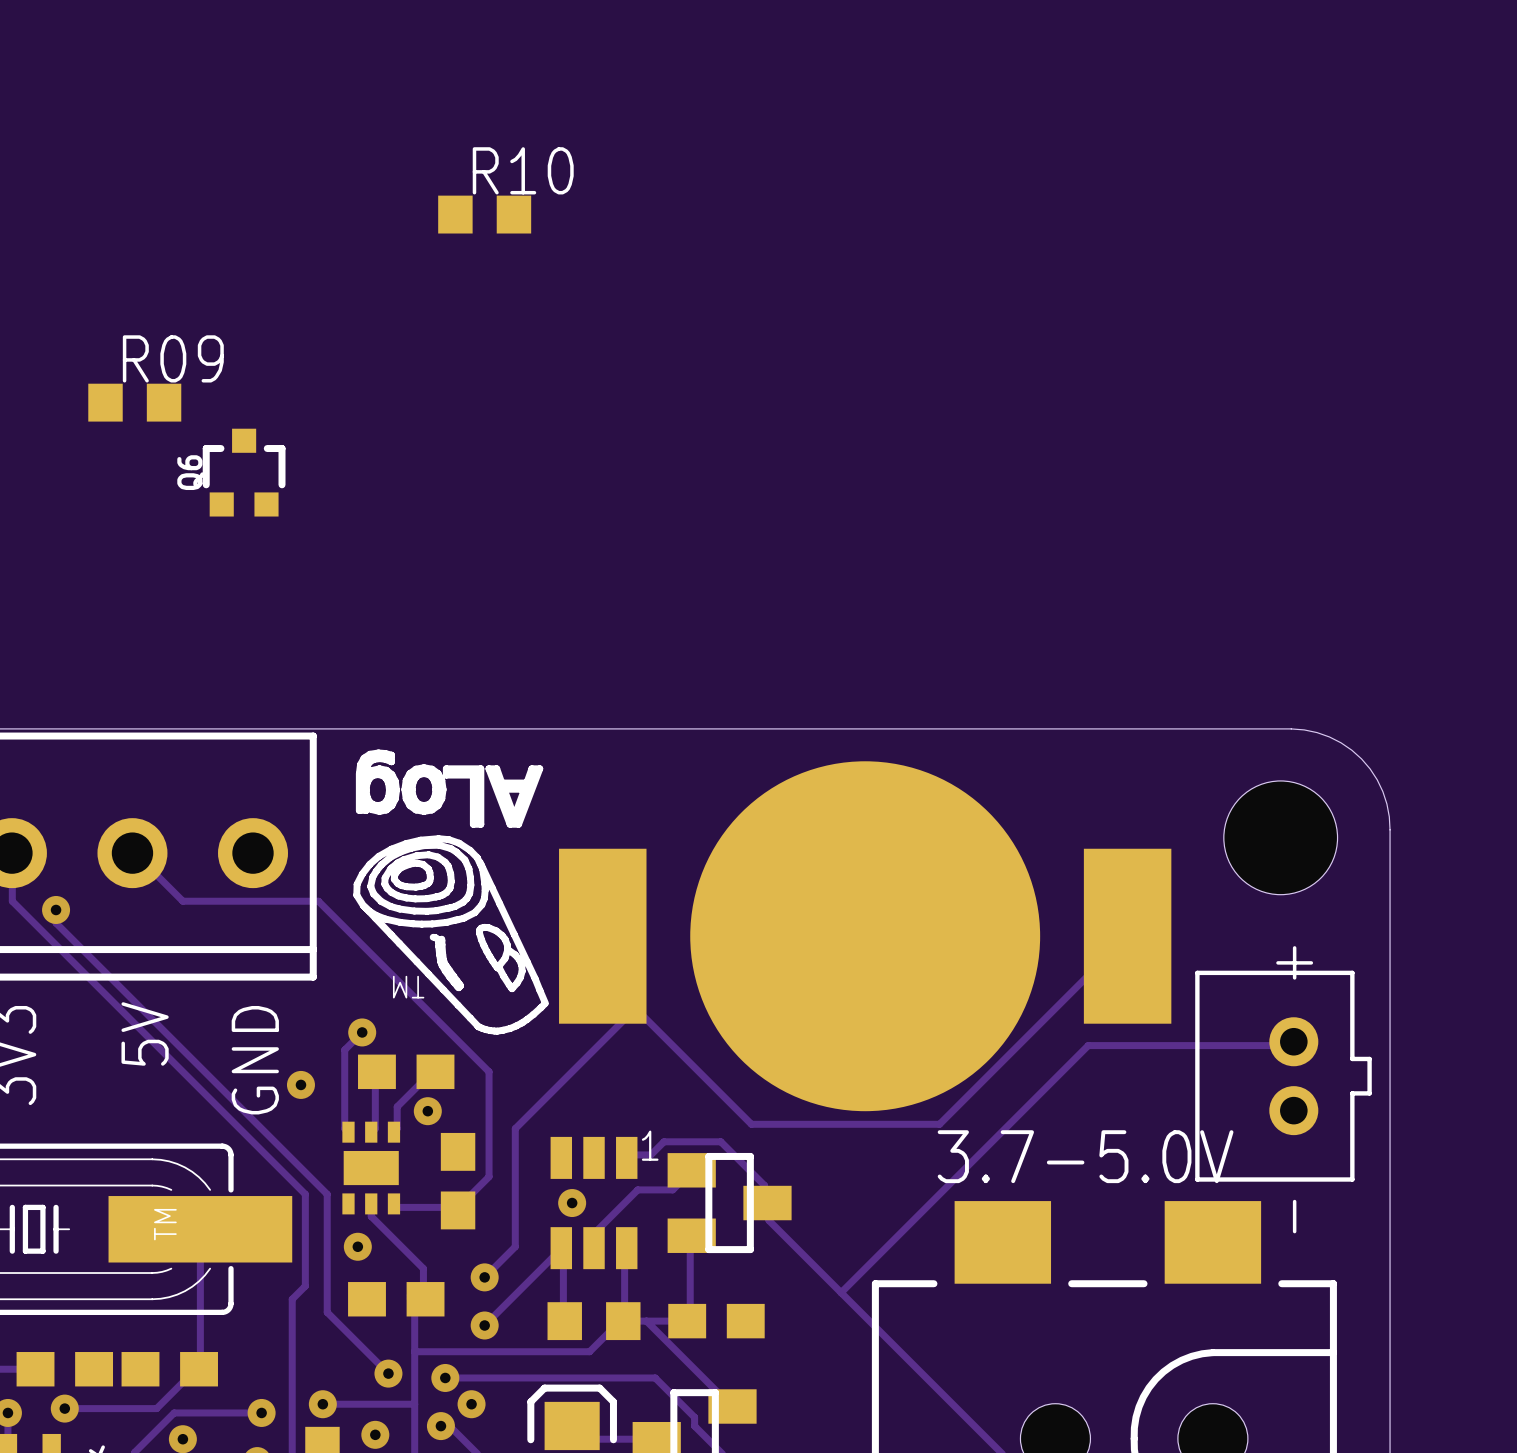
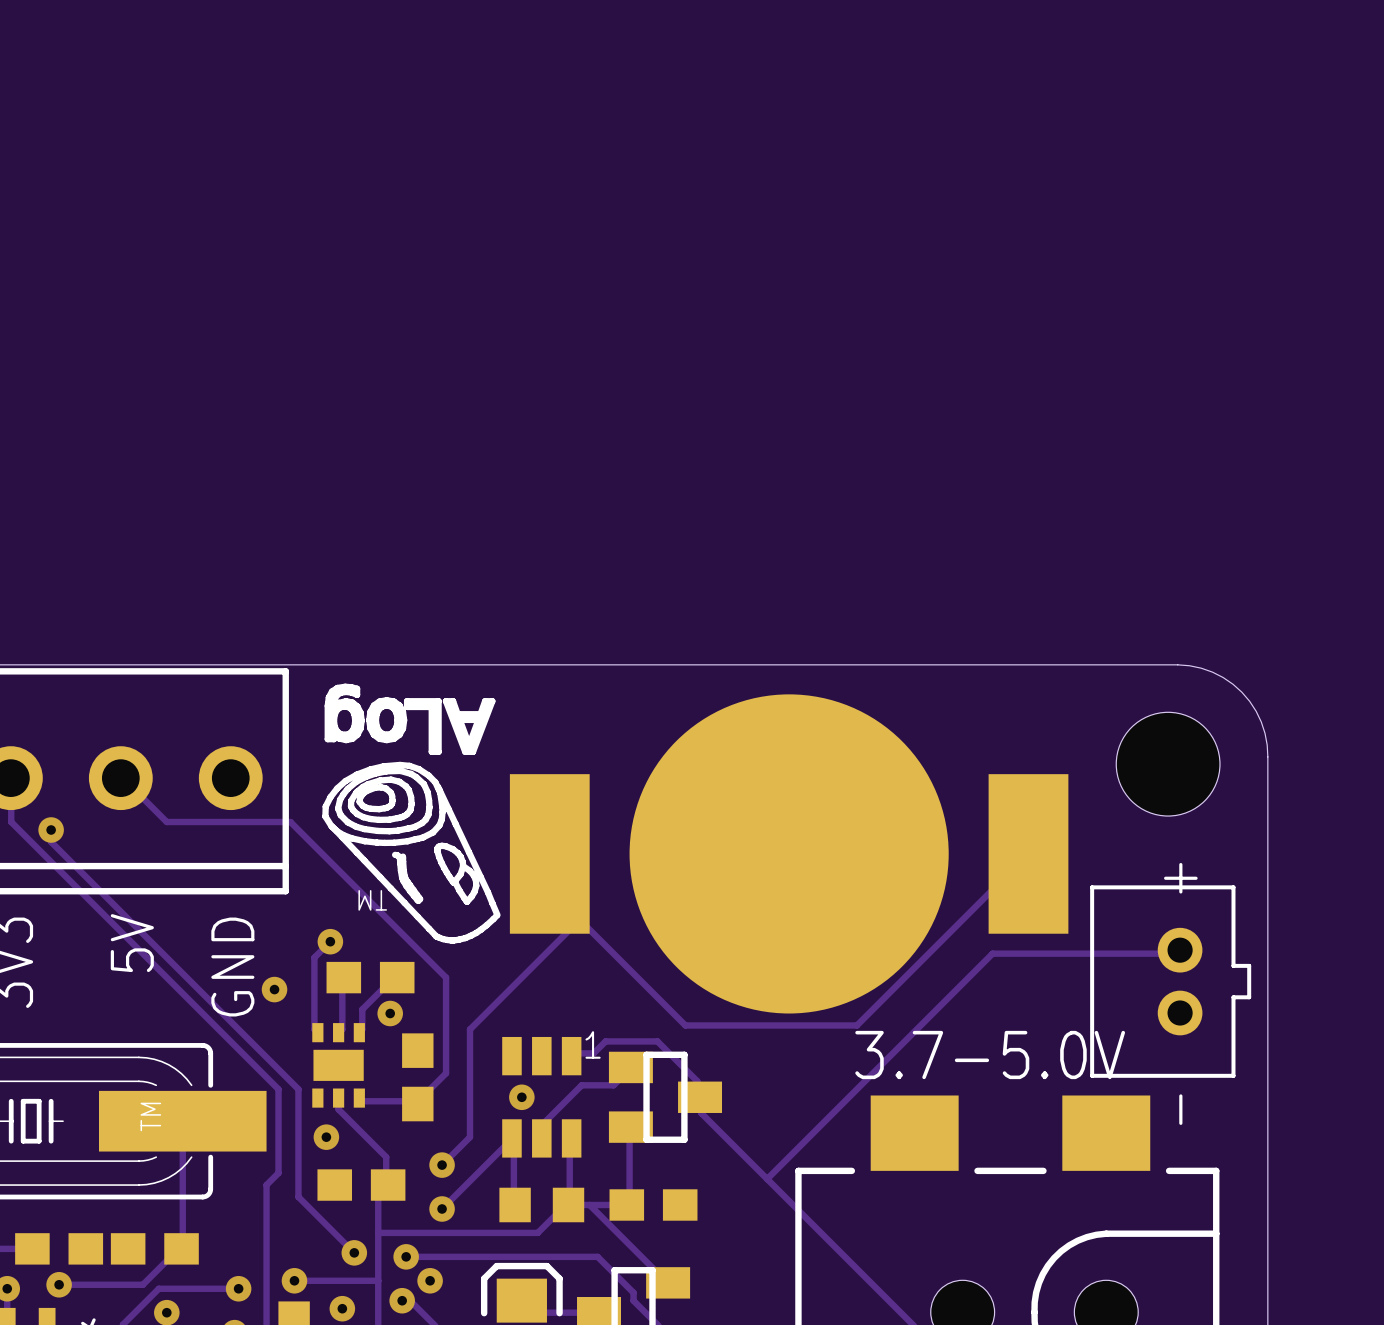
R10: (484, 214) -> none
R09: (134, 402) -> none
Q6: (244, 472) -> none

